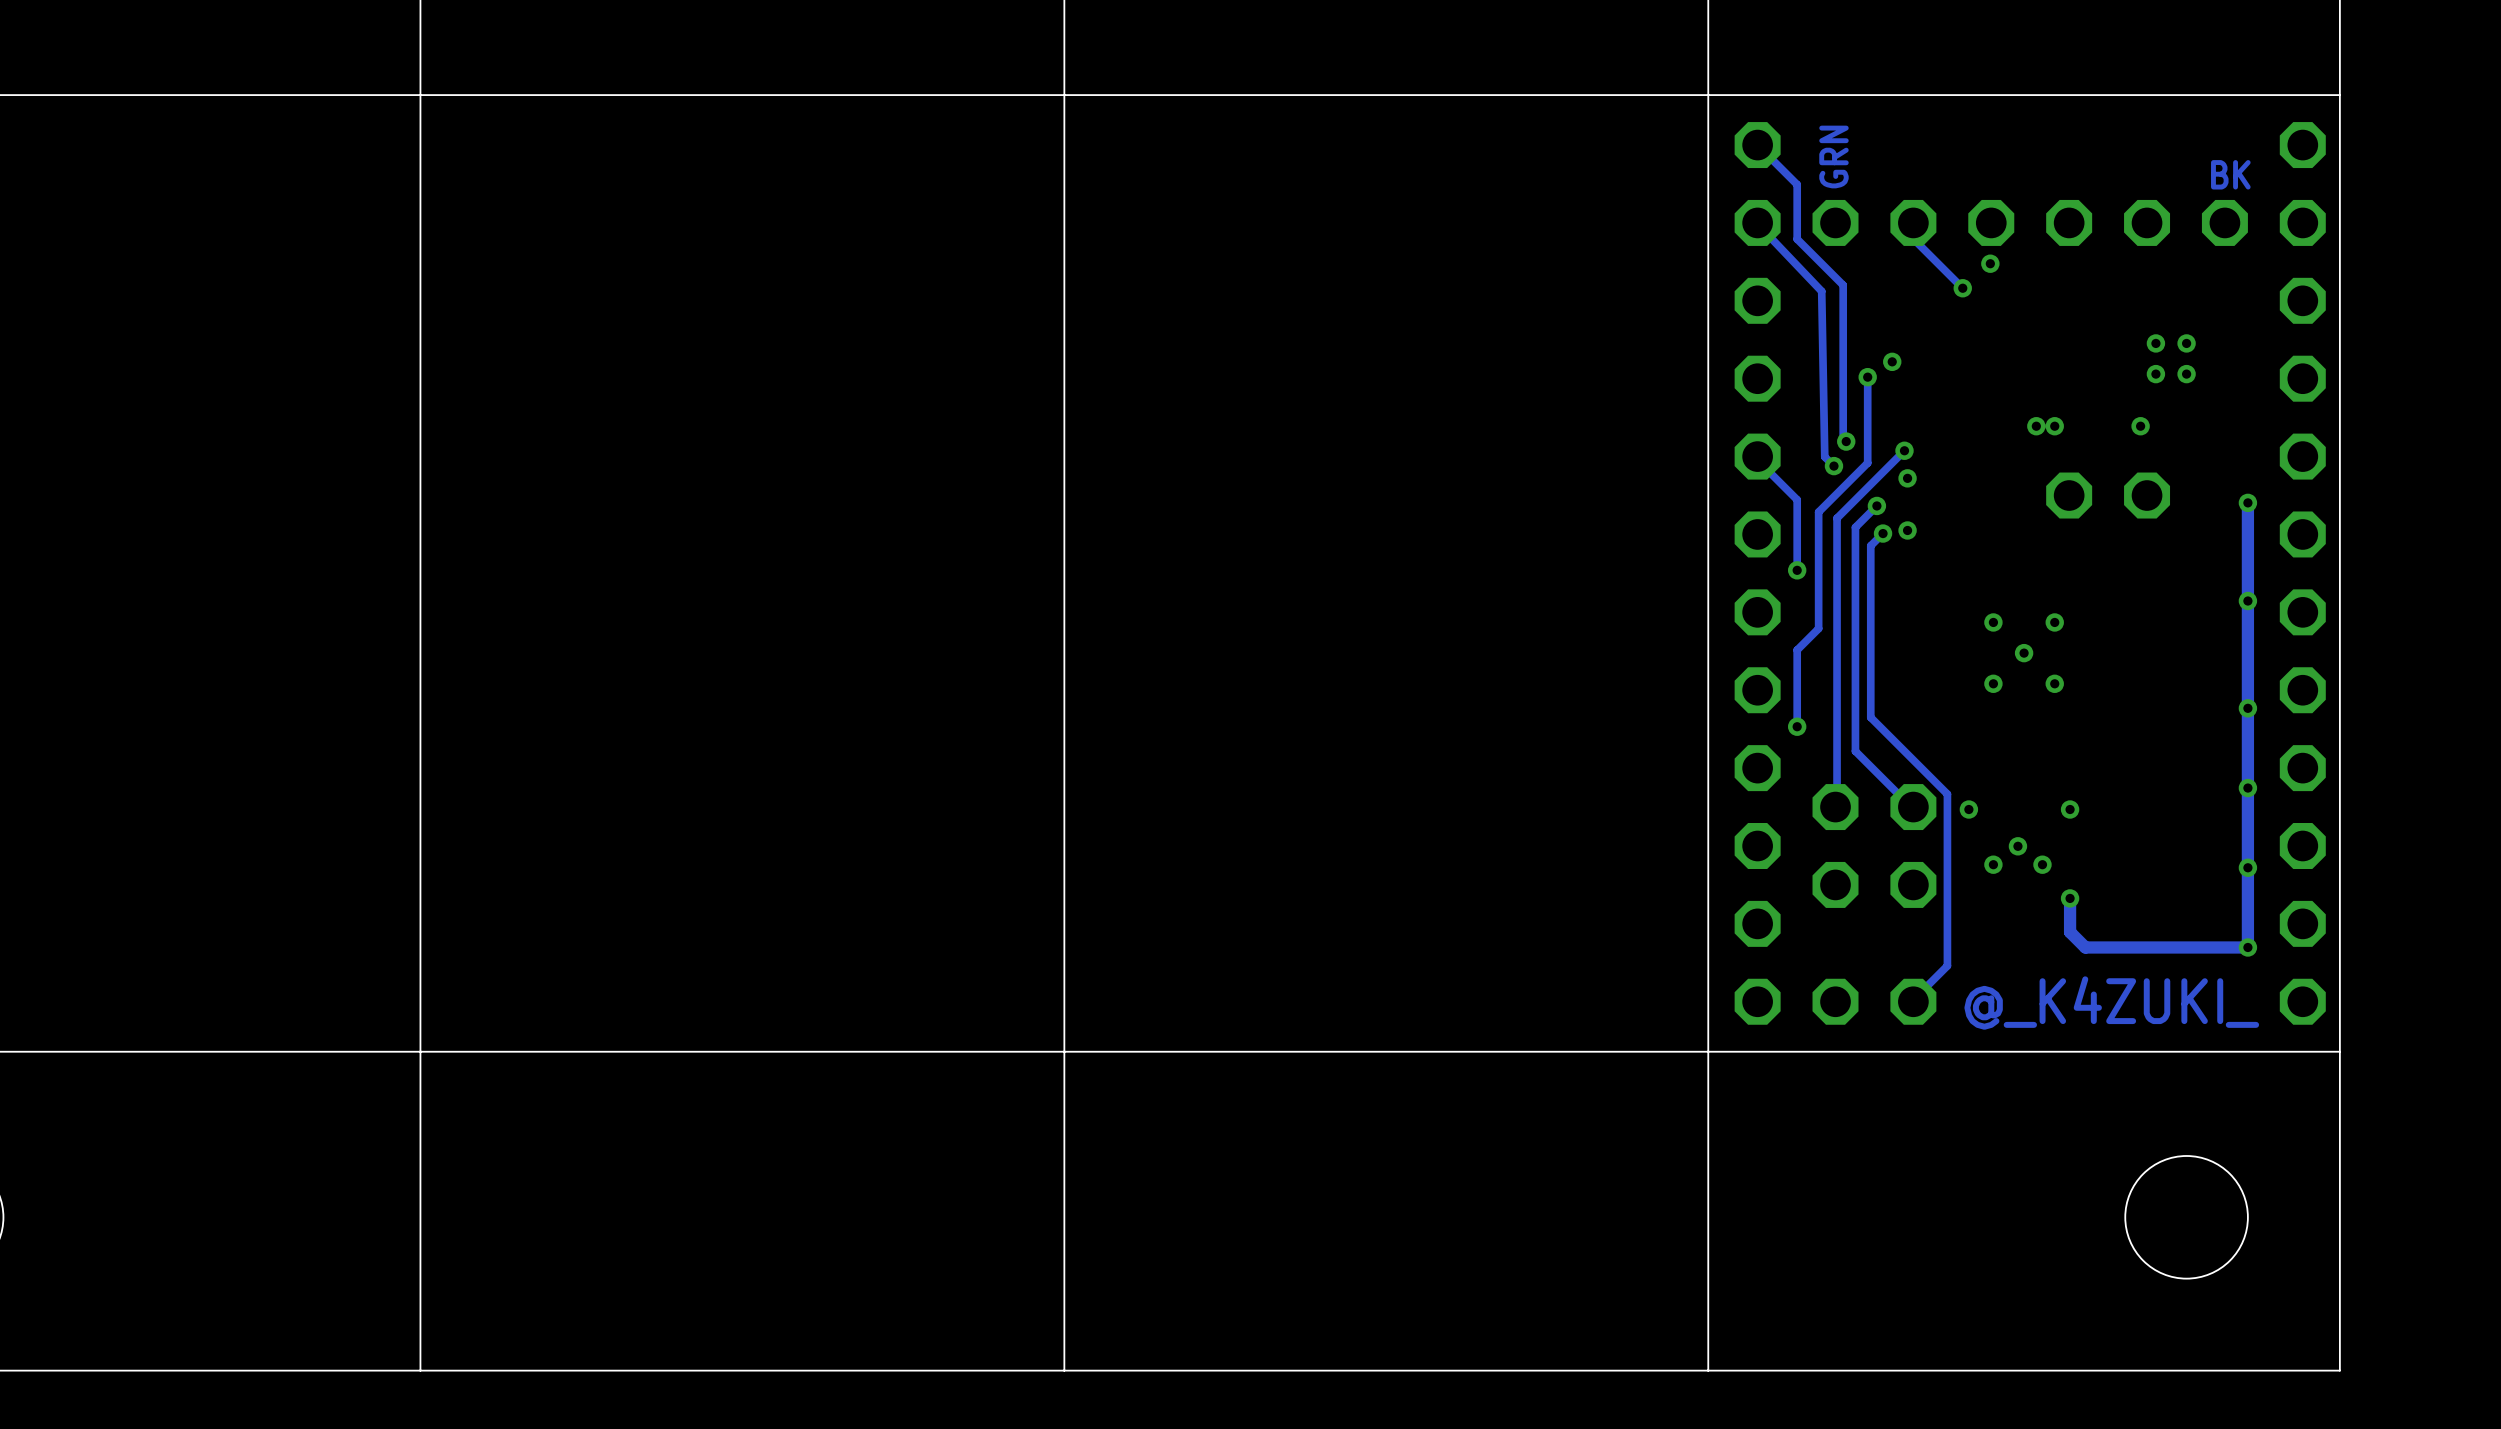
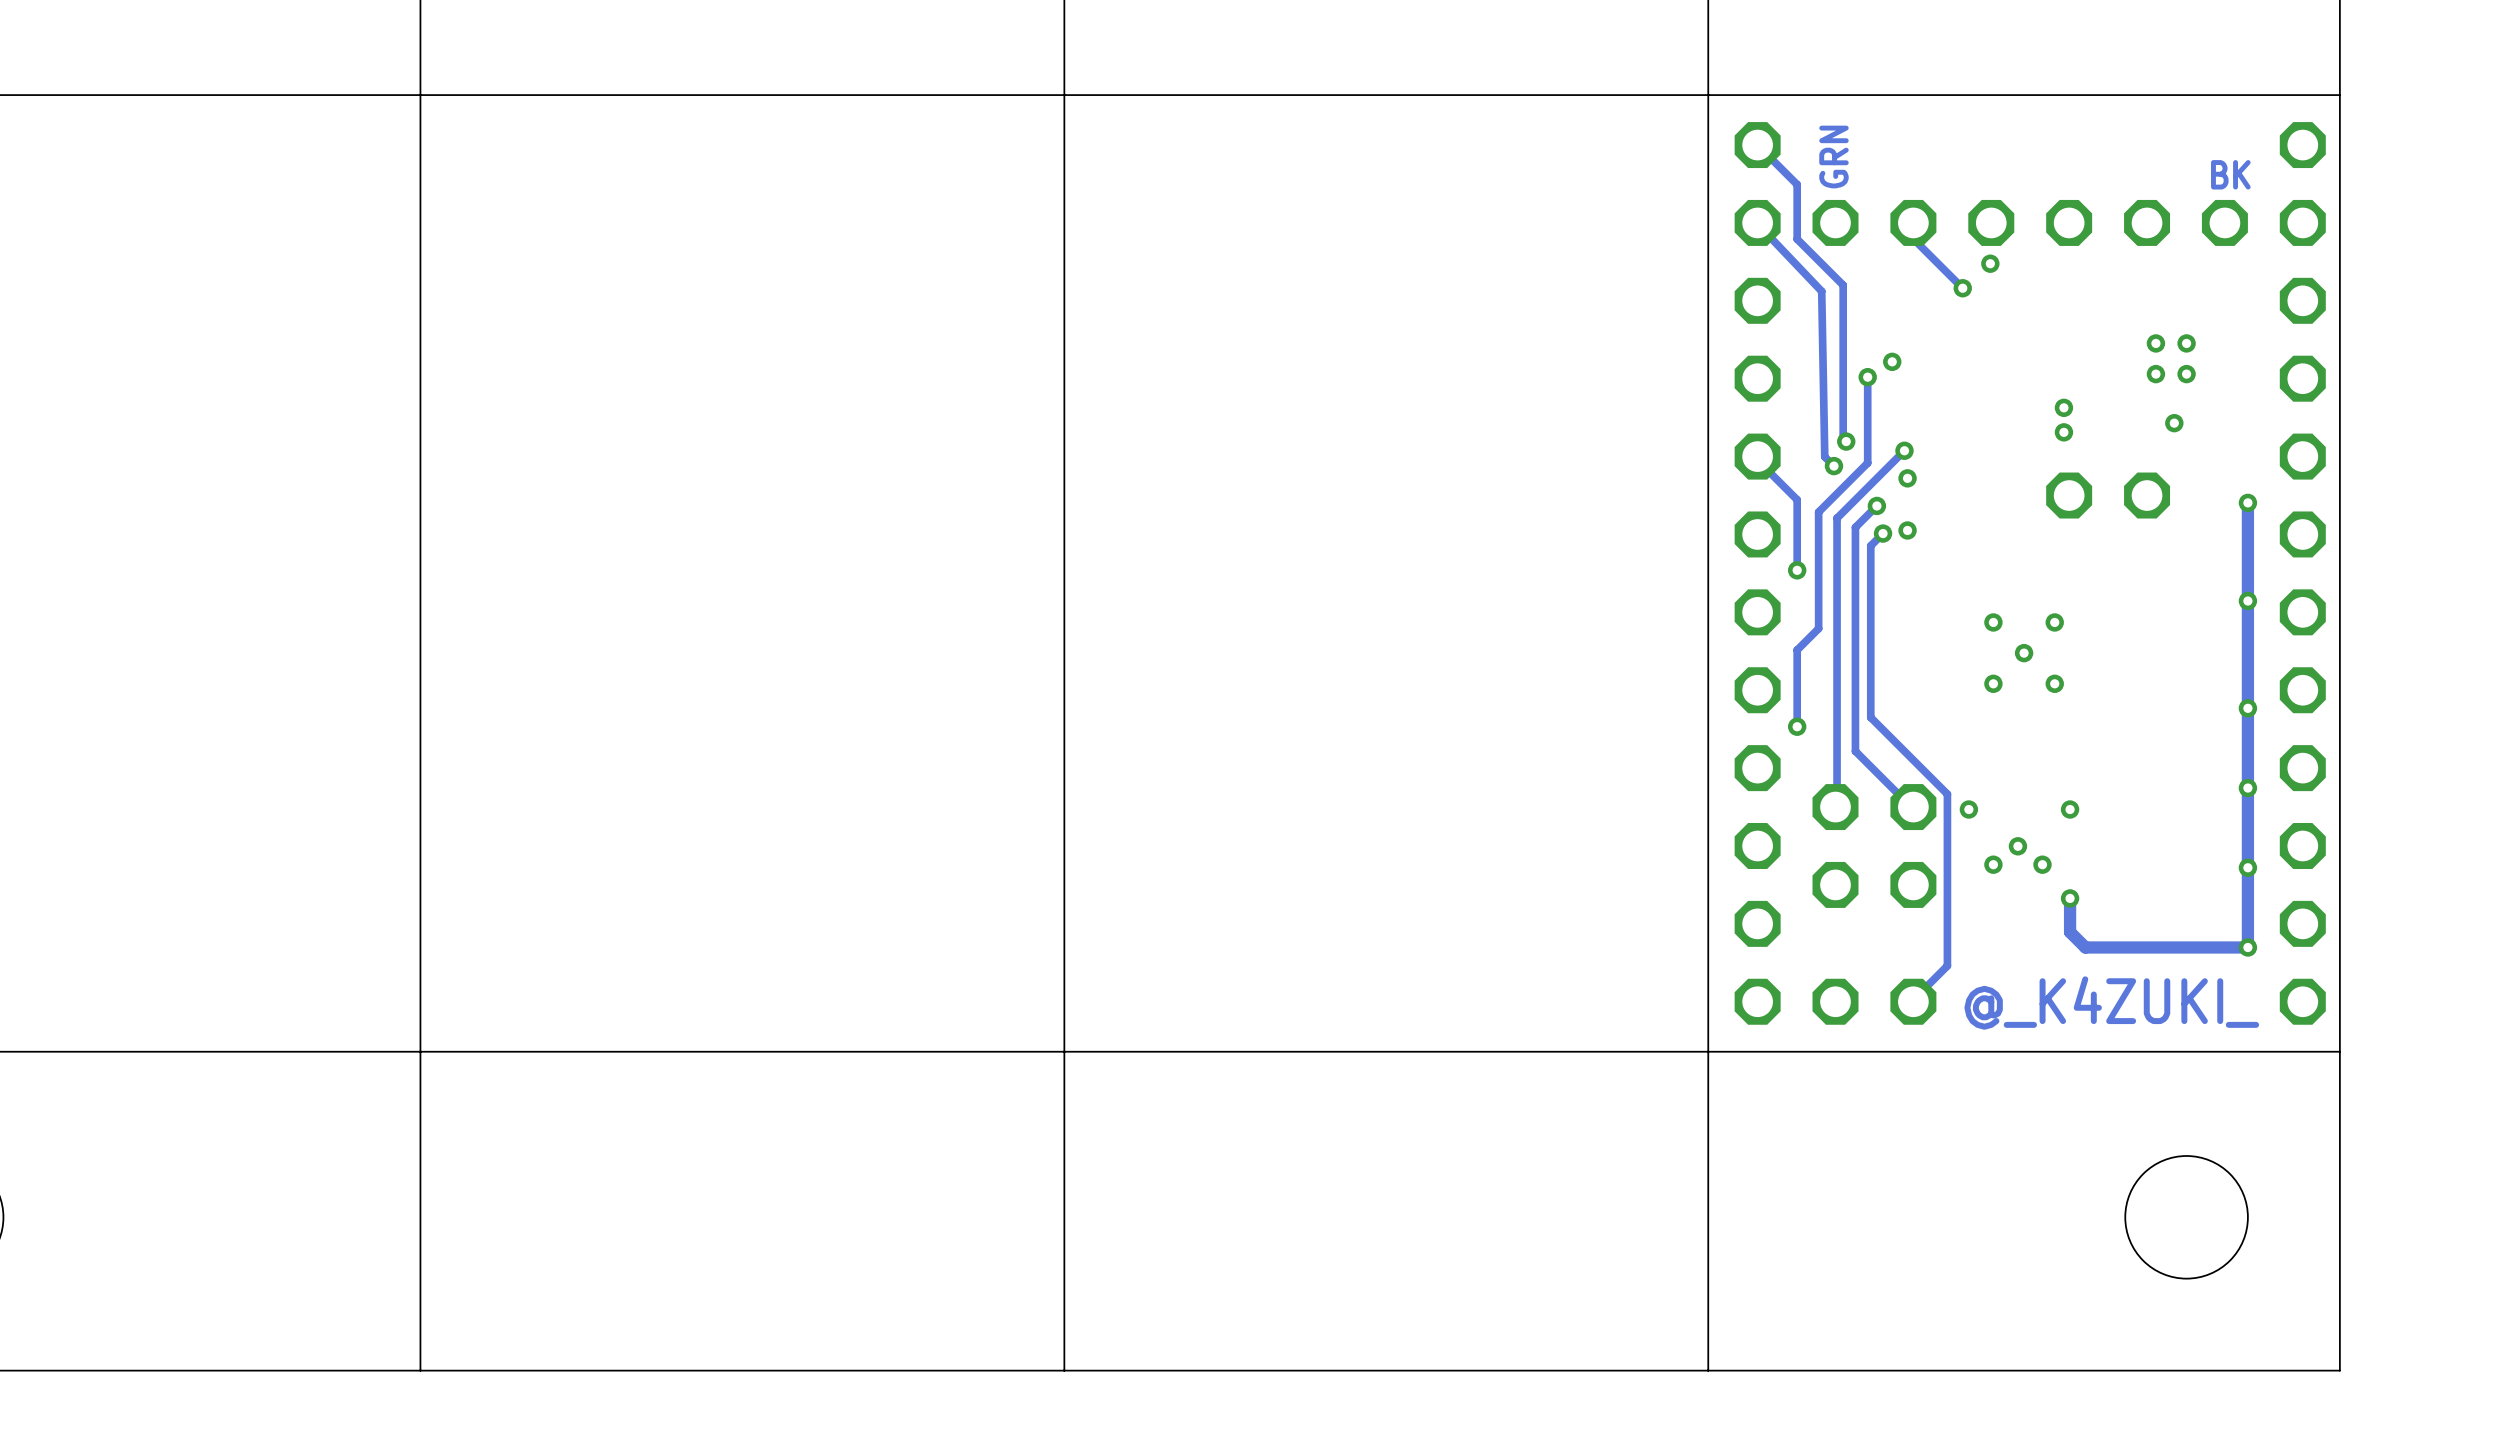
via: none -> (2063, 407)
via: (2036, 426) -> none
via: (2054, 426) -> none
via position: (2140, 426) -> (2174, 423)
via: none -> (2063, 432)

